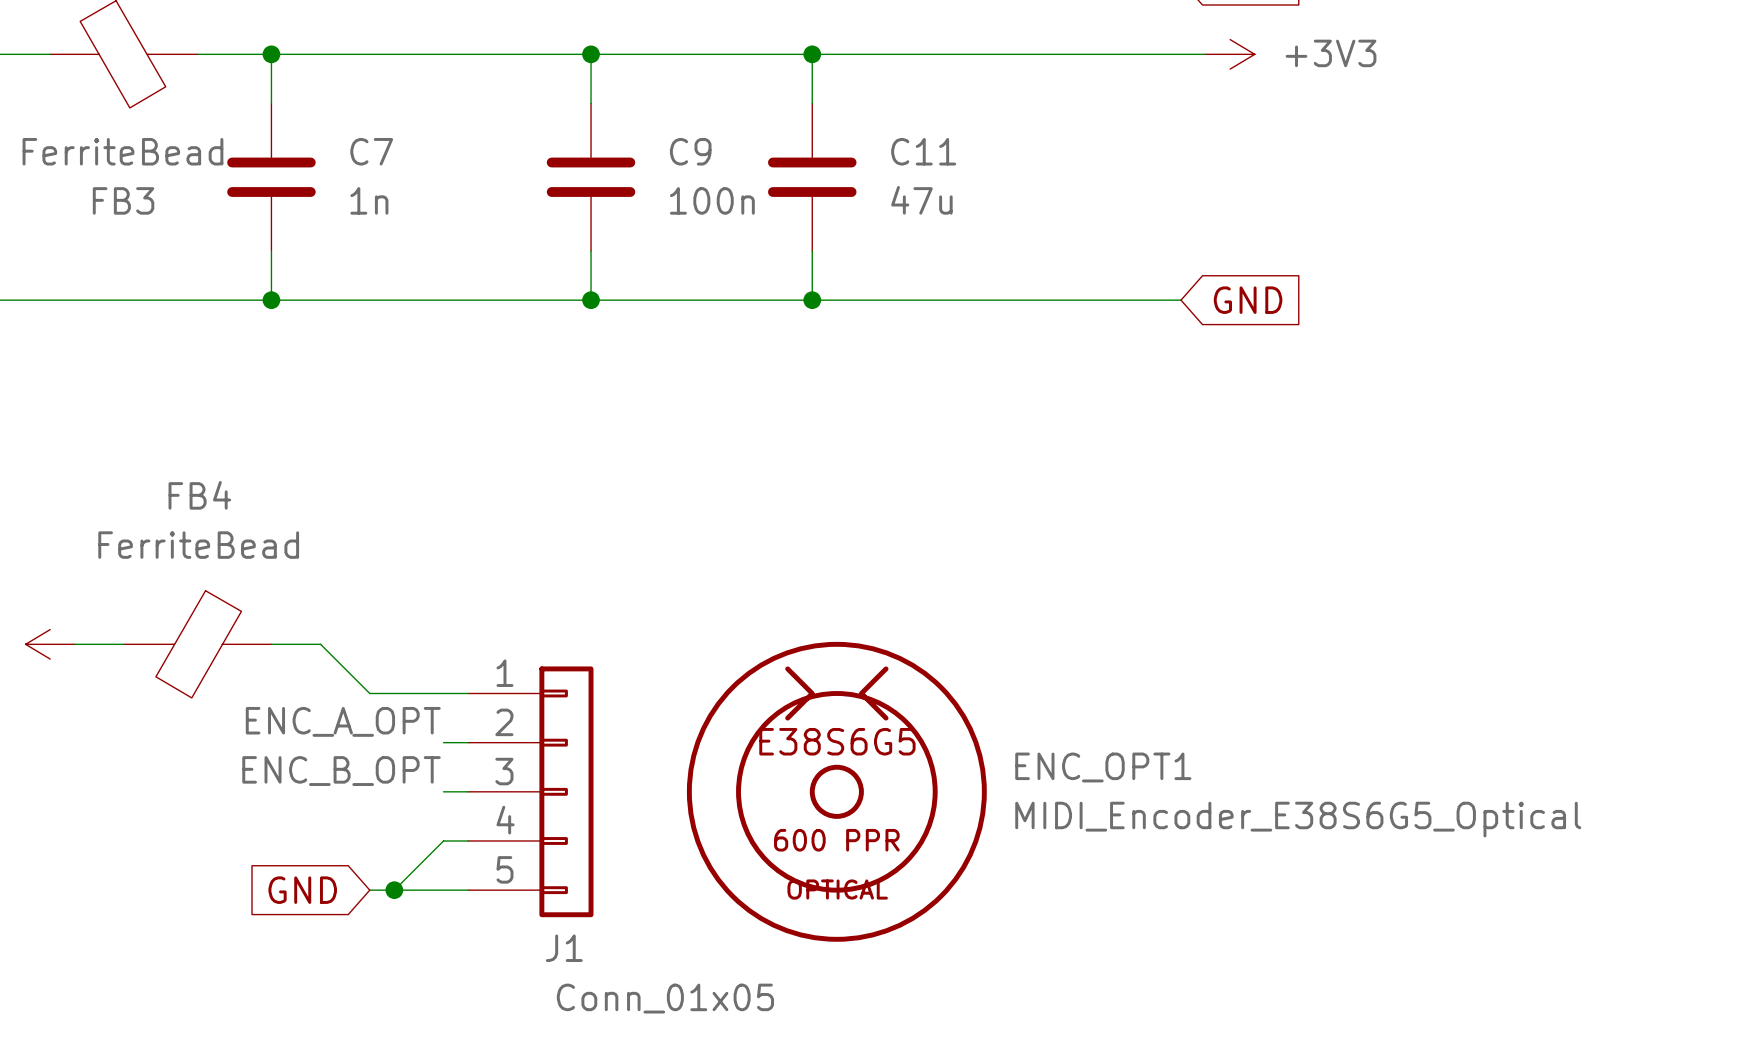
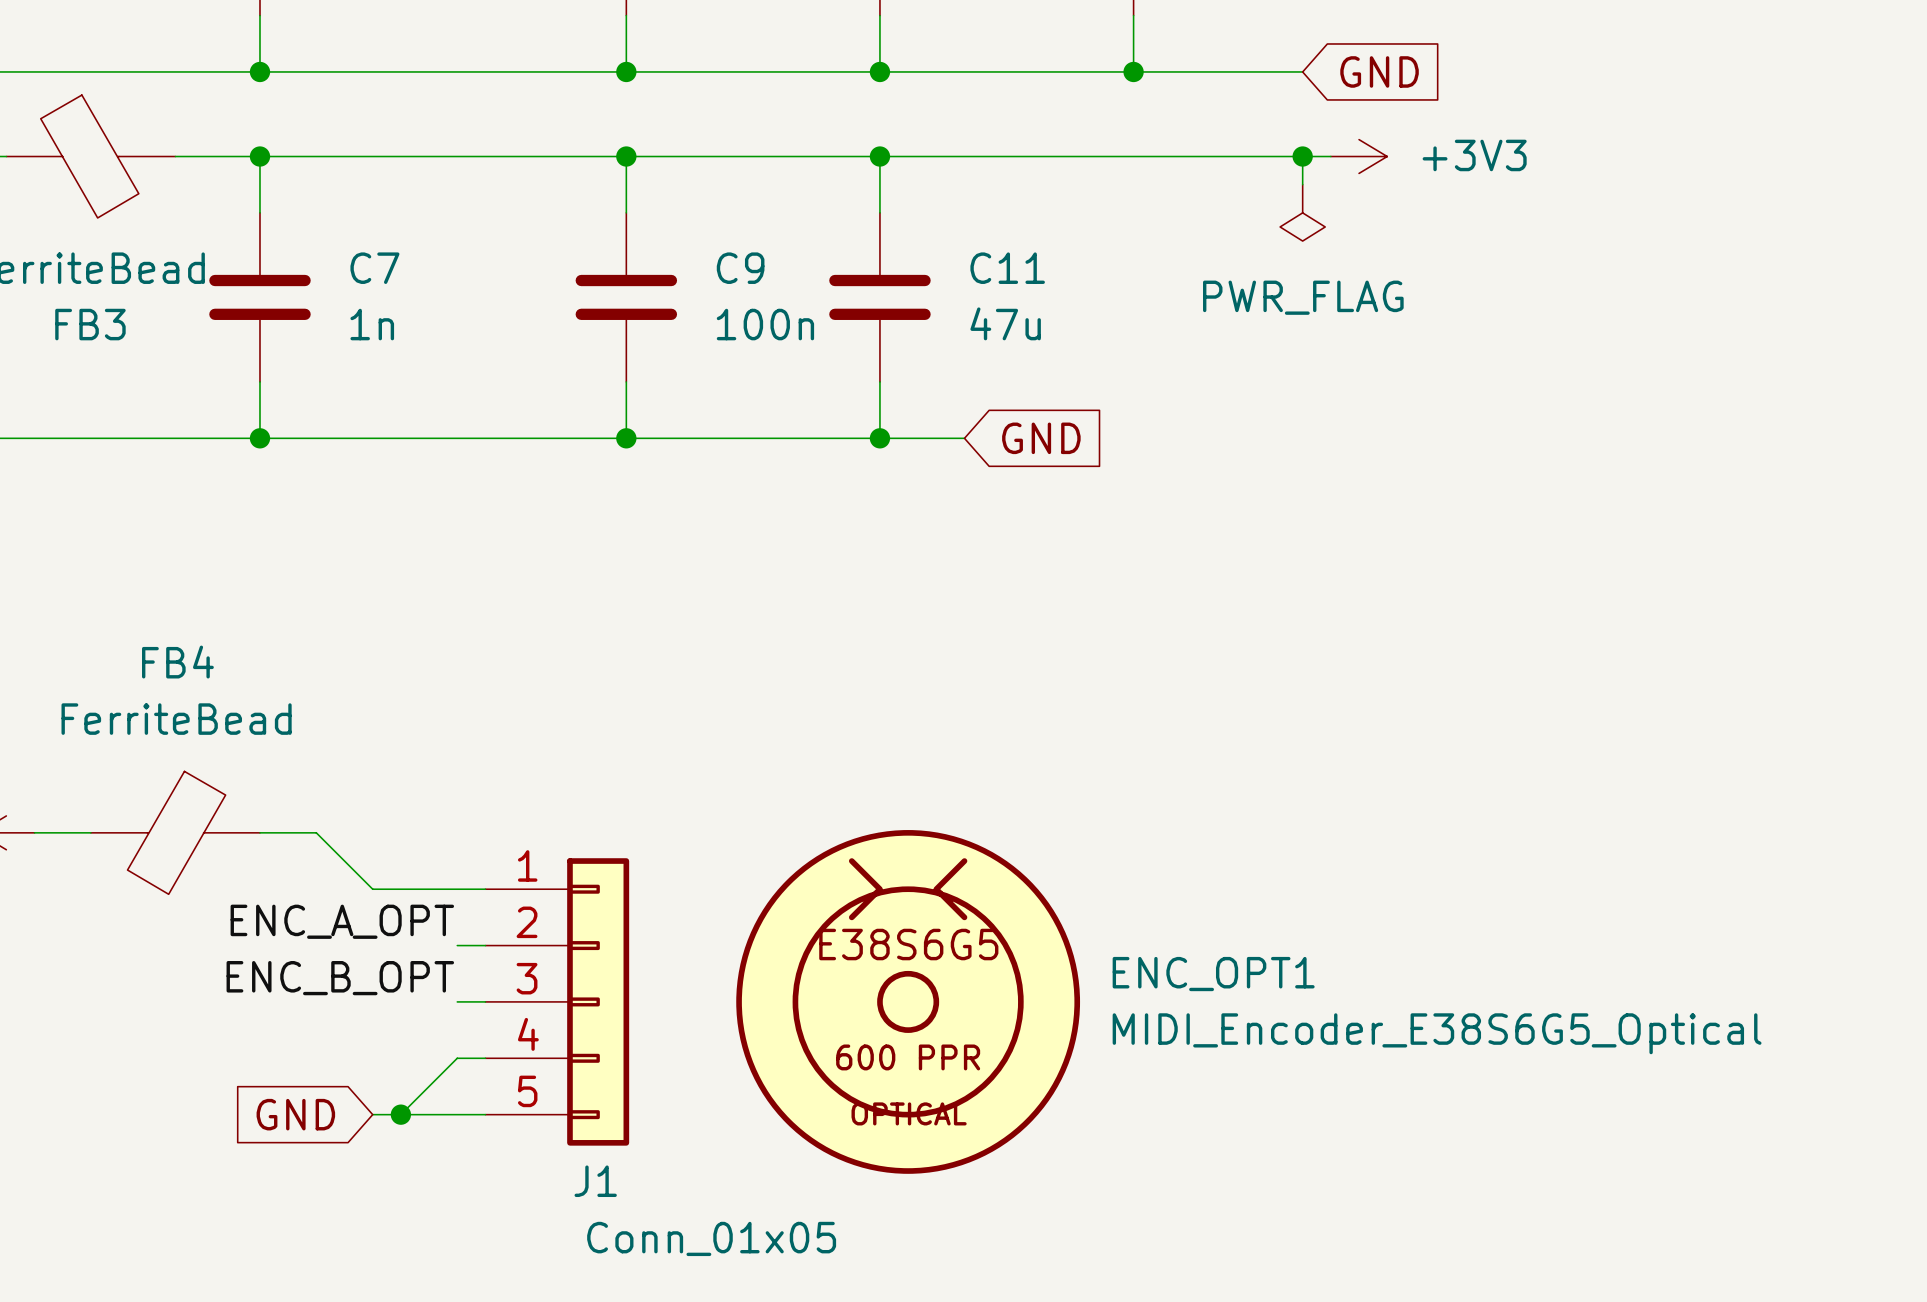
wire: none -> (1302, 156) (1302, 184)
junction: none -> (1302, 156)
power symbol: none -> PWR_FLAG (1302, 212)
wire: (886, 300) (1181, 300) -> none
global label position: GND (1248, 300) -> GND (1041, 438)

